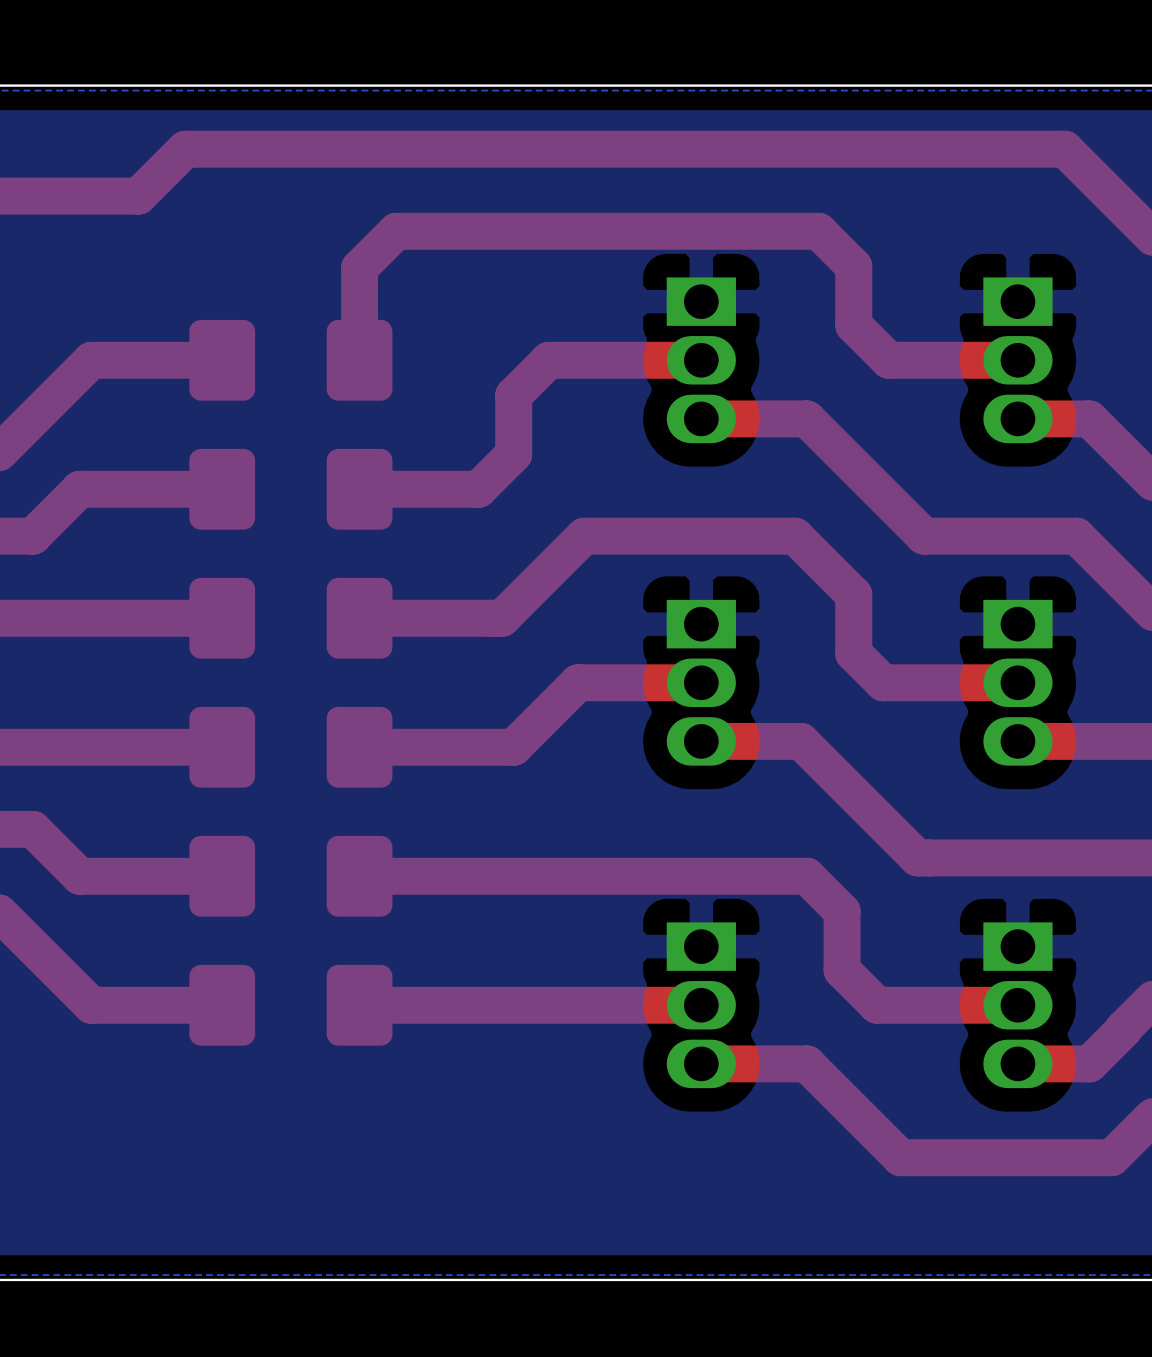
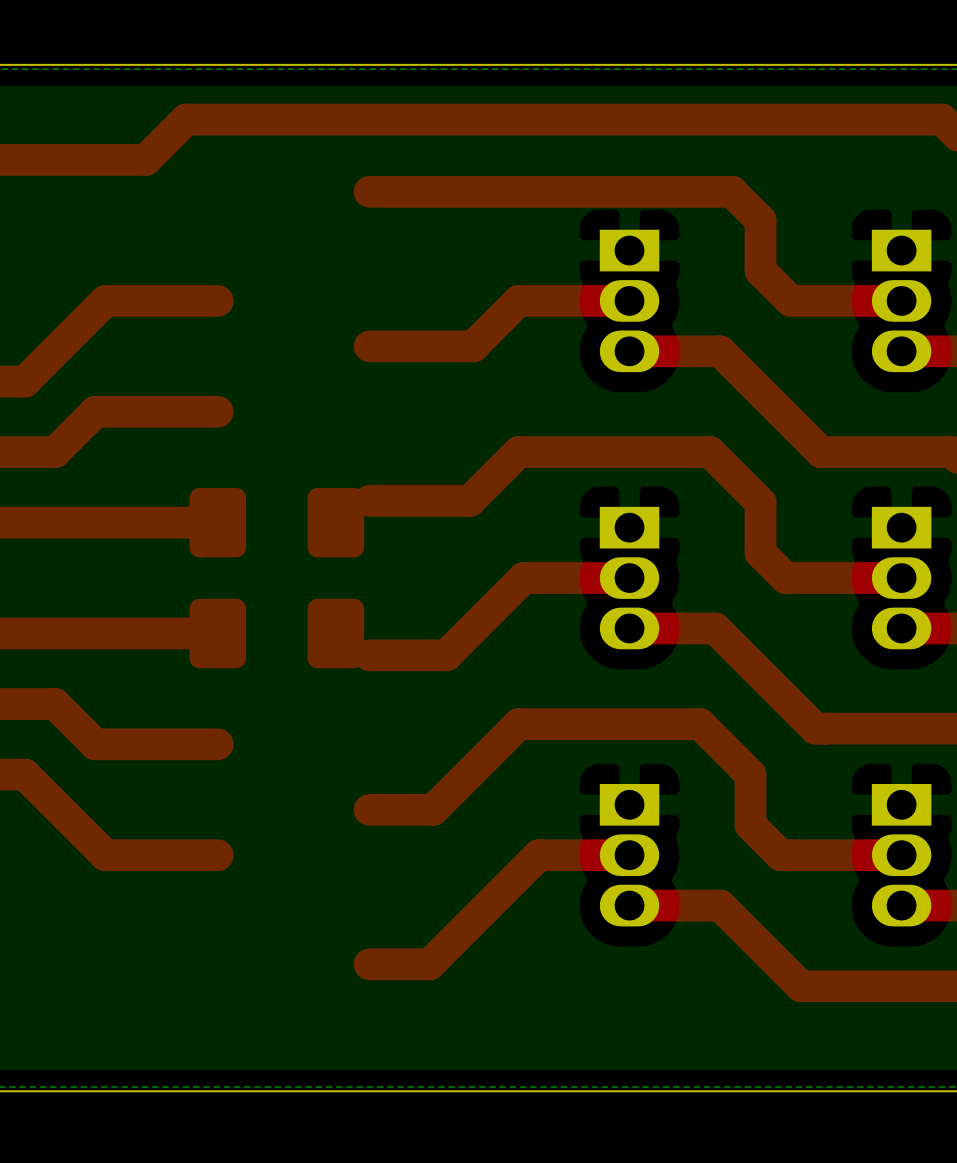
top track: (820, 233) (818, 231) (396, 231) (359, 268) (359, 360) -> (732, 191) (369, 191)
part: (290, 360) -> none
top track: (572, 360) (548, 360) (513, 395) (513, 454) (478, 489) (359, 489) -> (518, 300) (473, 346) (369, 346)
part: (290, 489) -> none
top track: (584, 536) (501, 618) (359, 618) -> (528, 452) (518, 452) (469, 500) (369, 500)
top track: (513, 747) (359, 747) -> (468, 633) (446, 655) (369, 655)
part: (290, 876) -> none
top track: (806, 876) (359, 876) -> (720, 744) (700, 724) (518, 724) (433, 809) (369, 809)
part: (290, 1005) -> none
top track: (595, 1005) (359, 1005) -> (538, 855) (429, 964) (369, 964)

